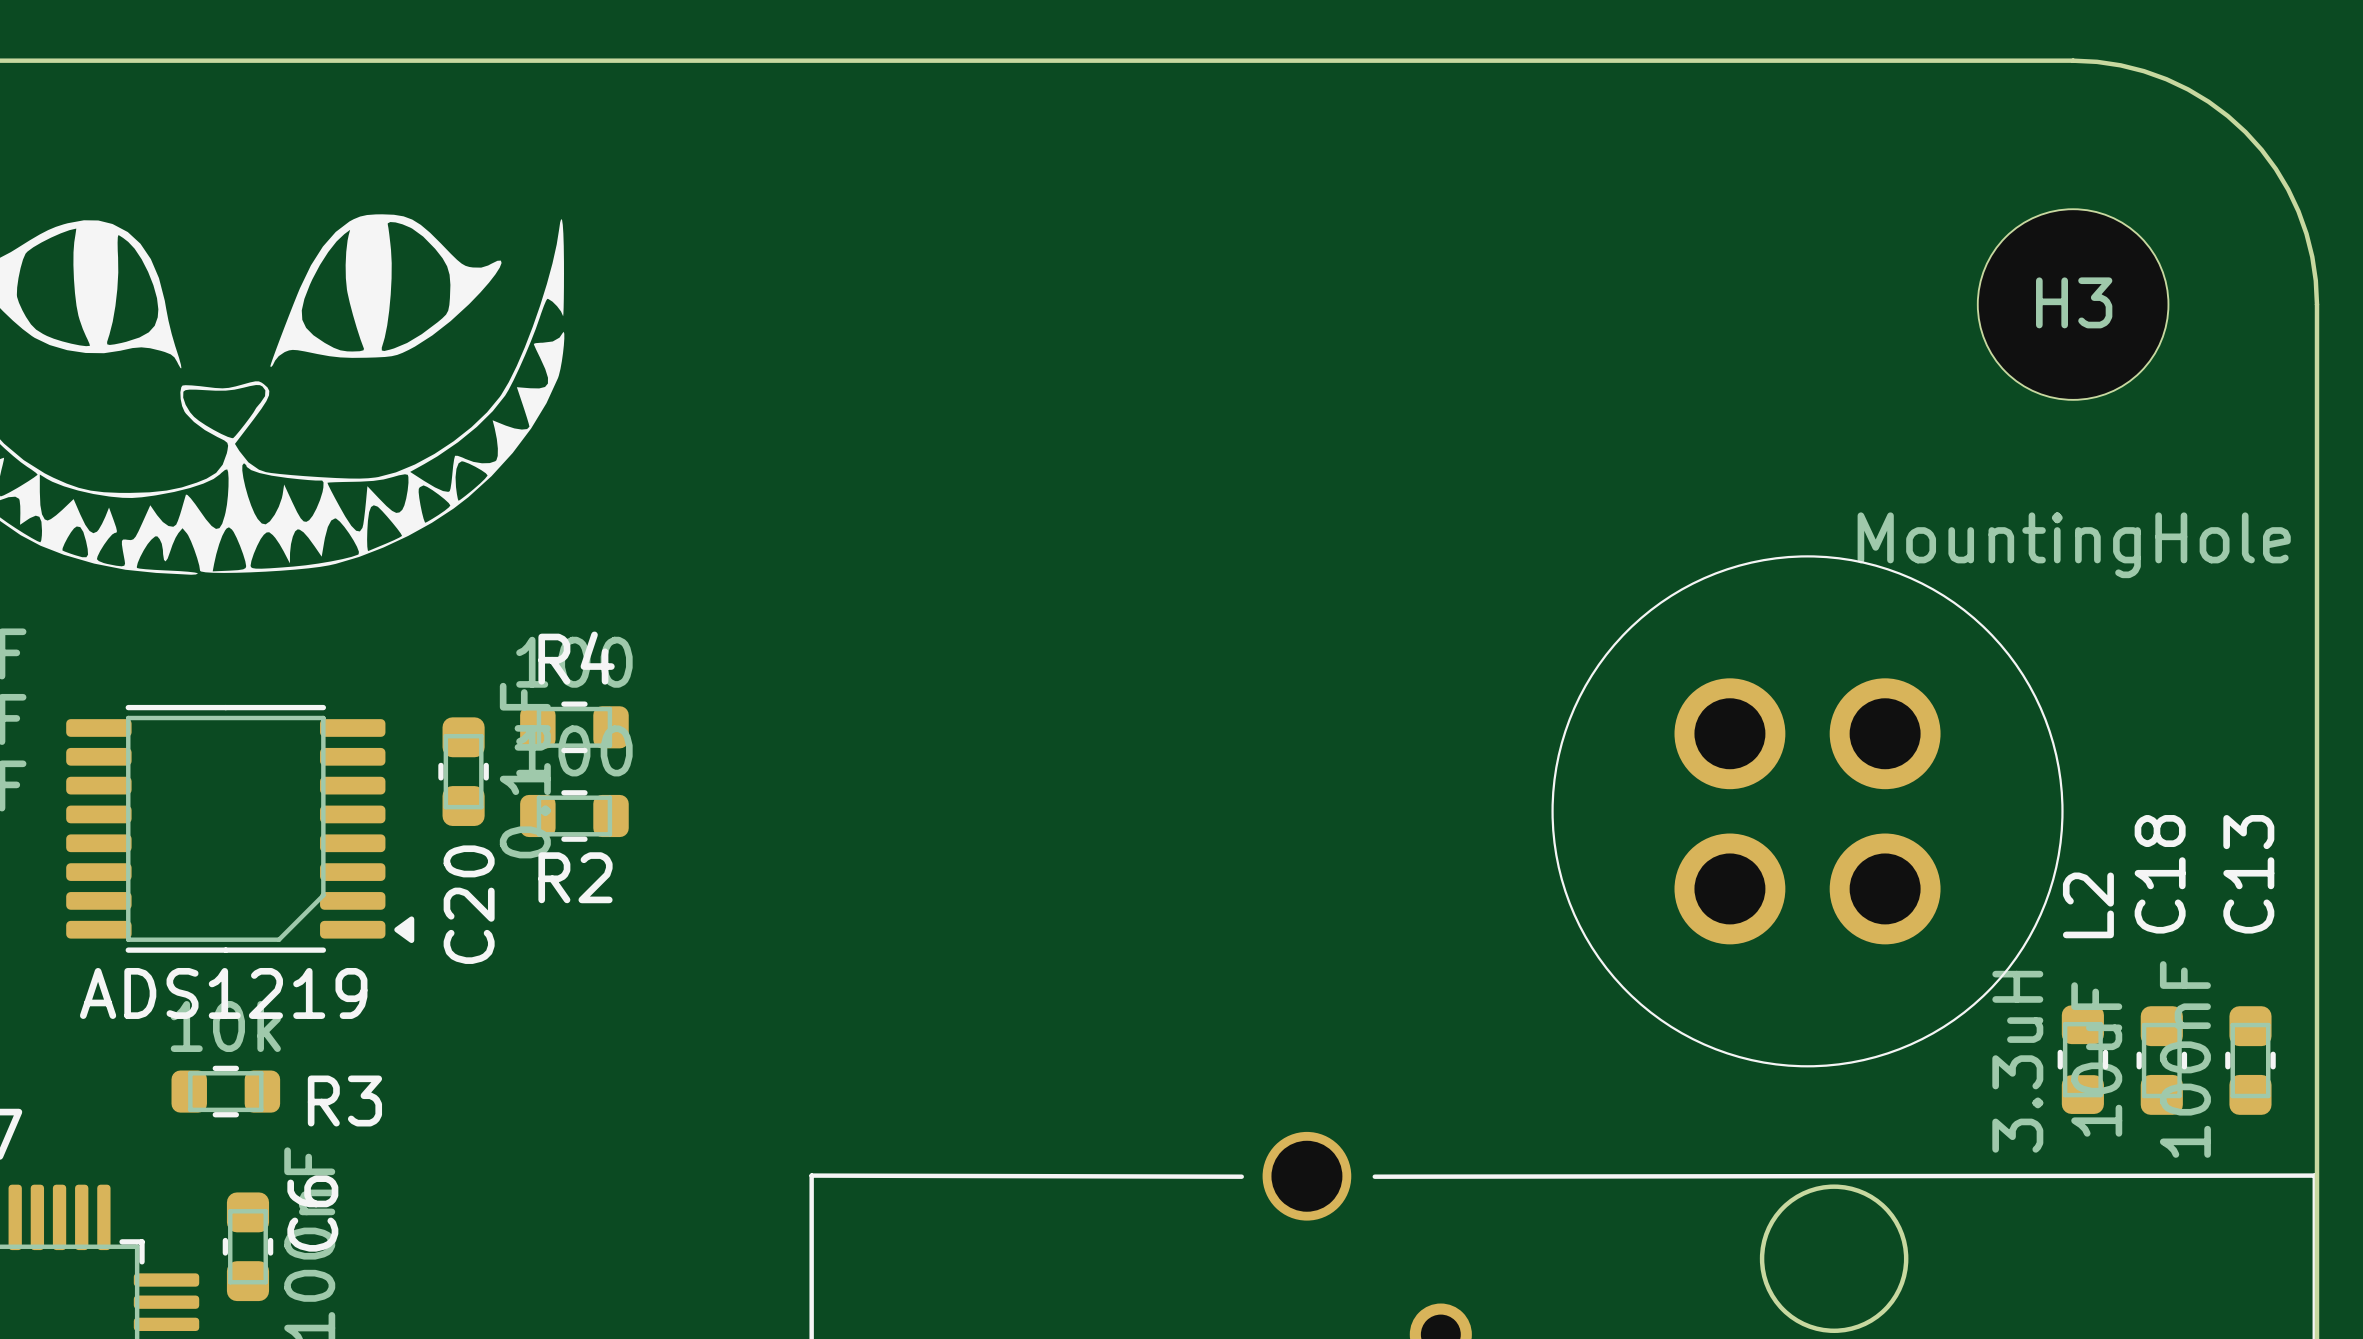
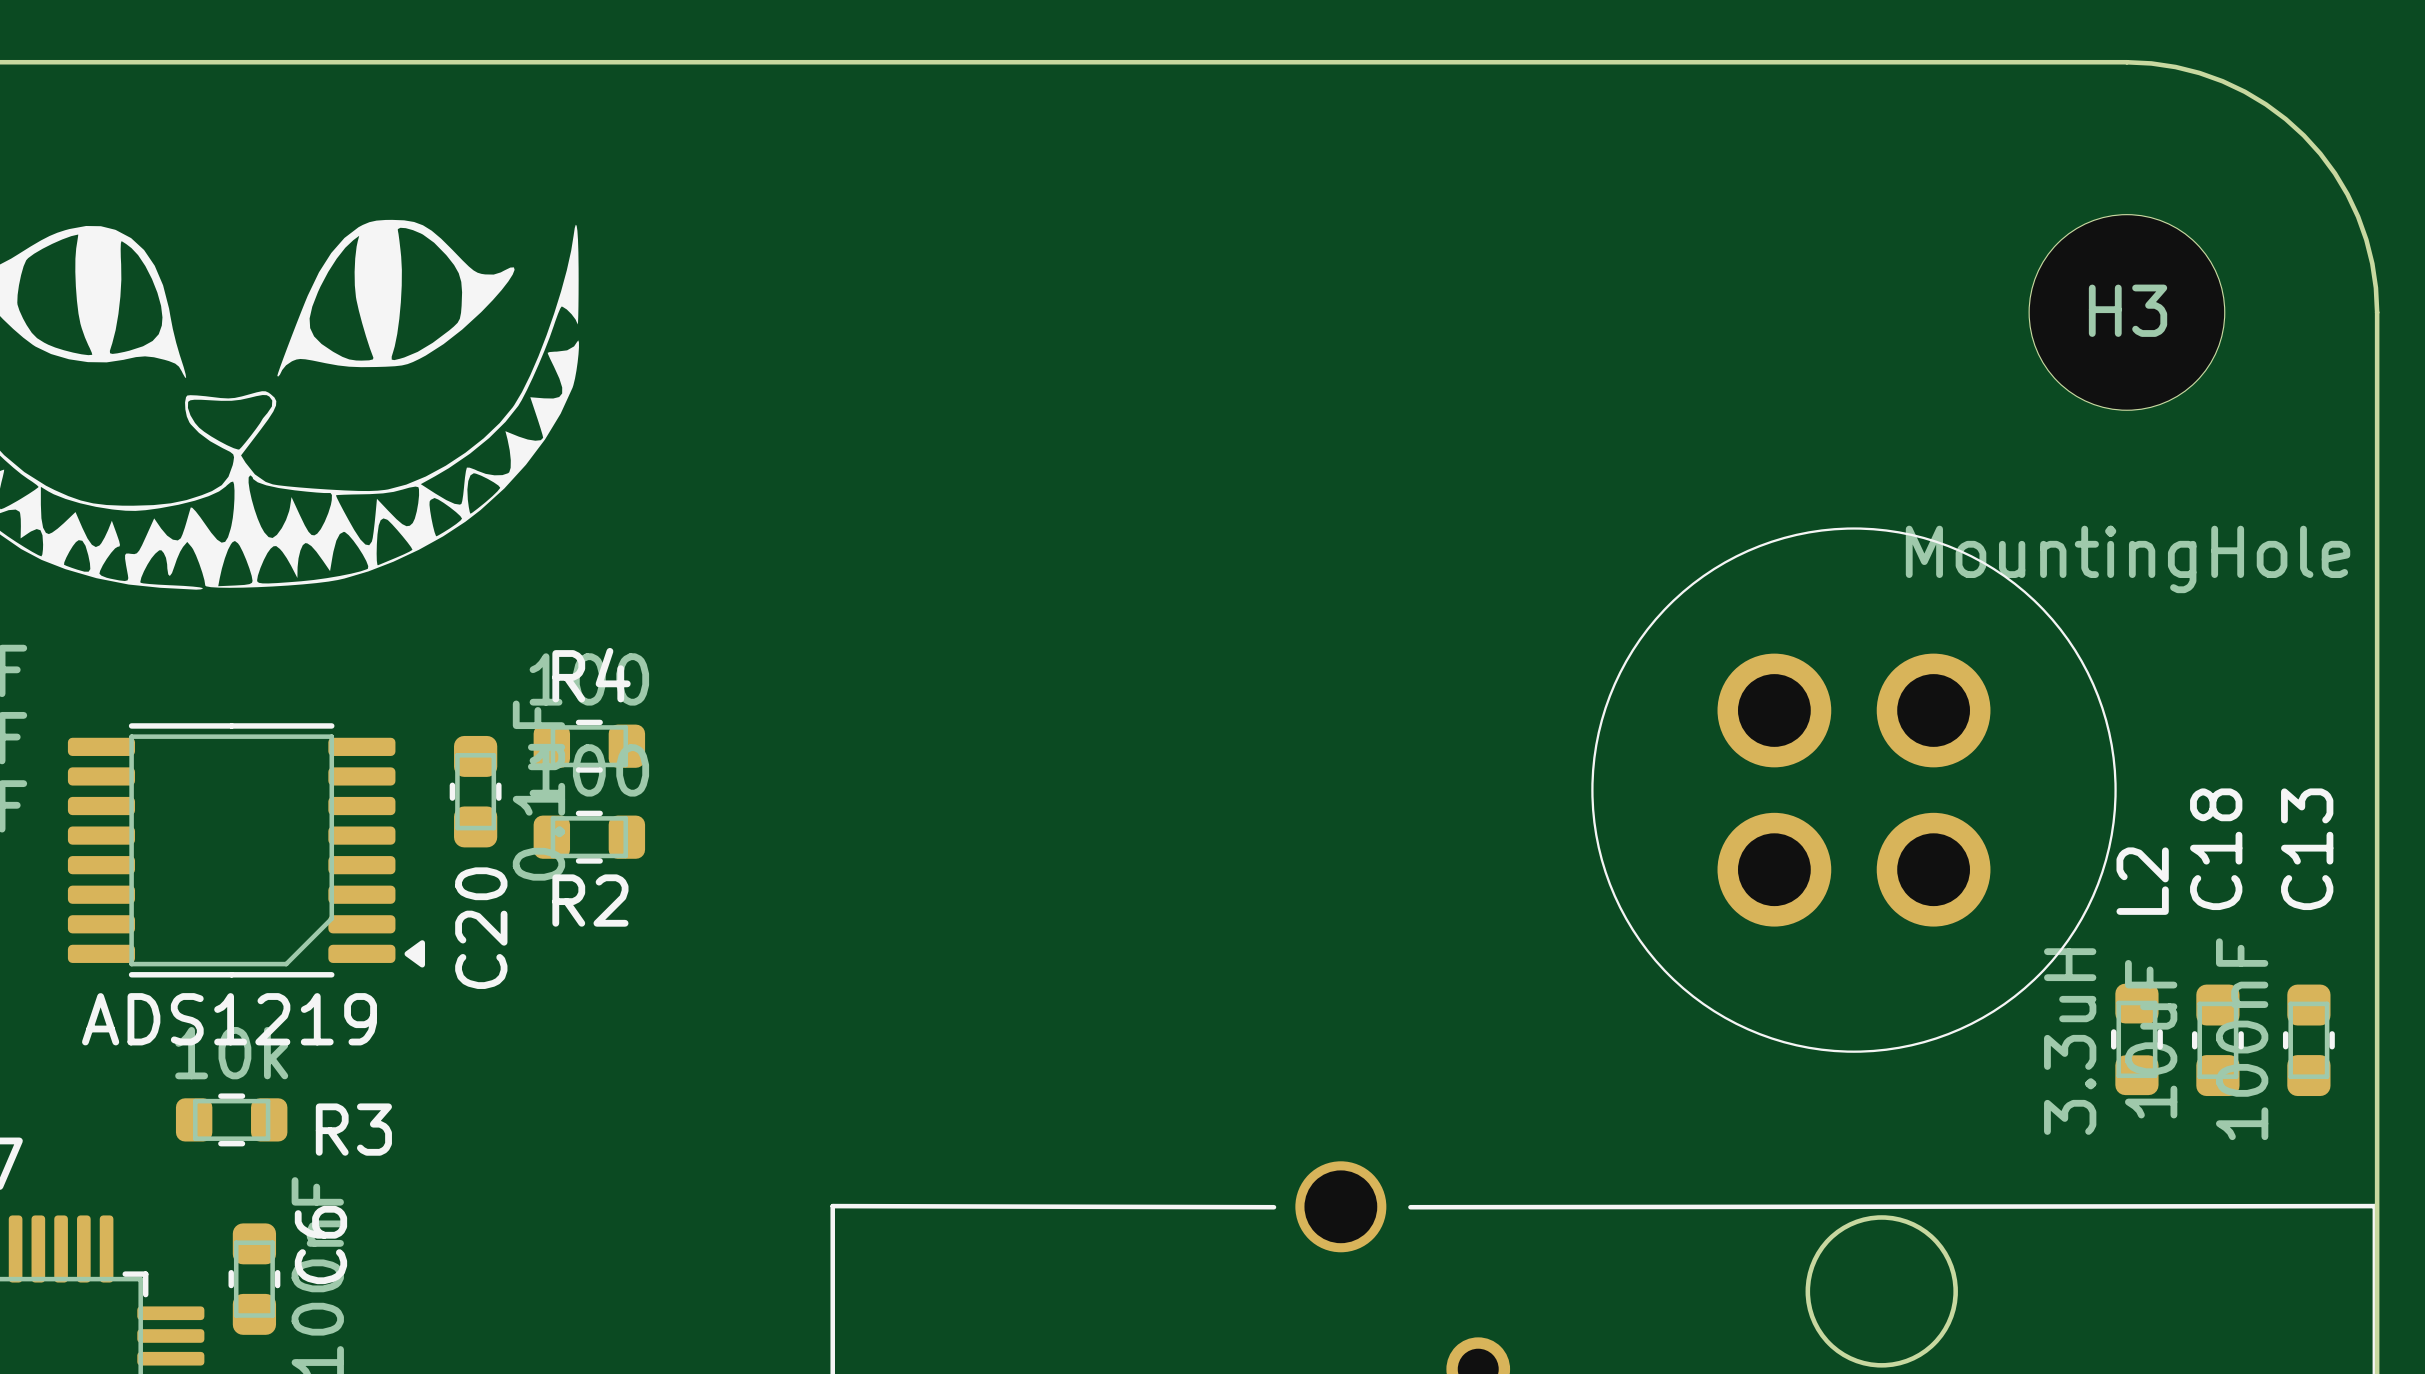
part position: (1807, 811) -> (1853, 790)
L2 position: (2082, 1059) -> (2136, 1039)
C18 position: (2161, 1060) -> (2217, 1040)
C13 position: (2250, 1060) -> (2308, 1040)

